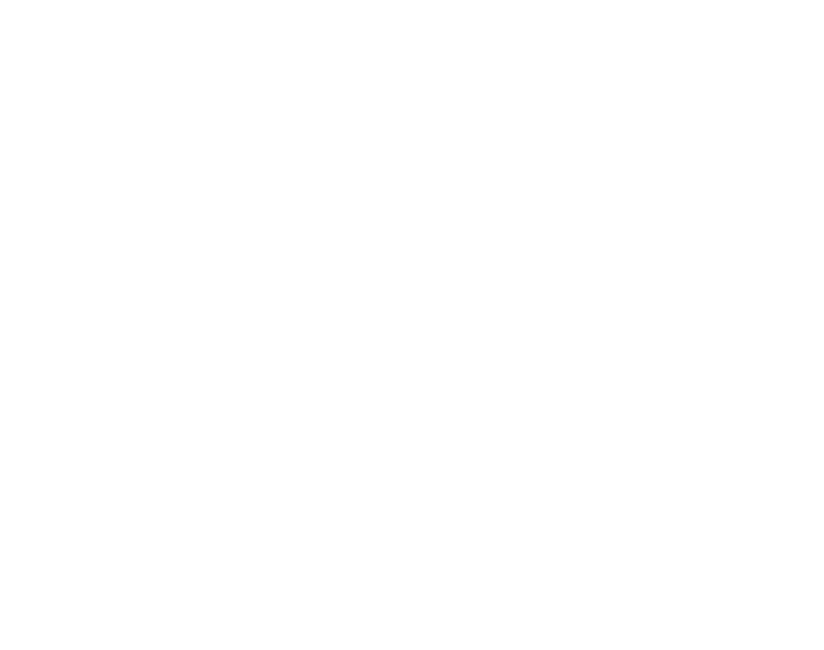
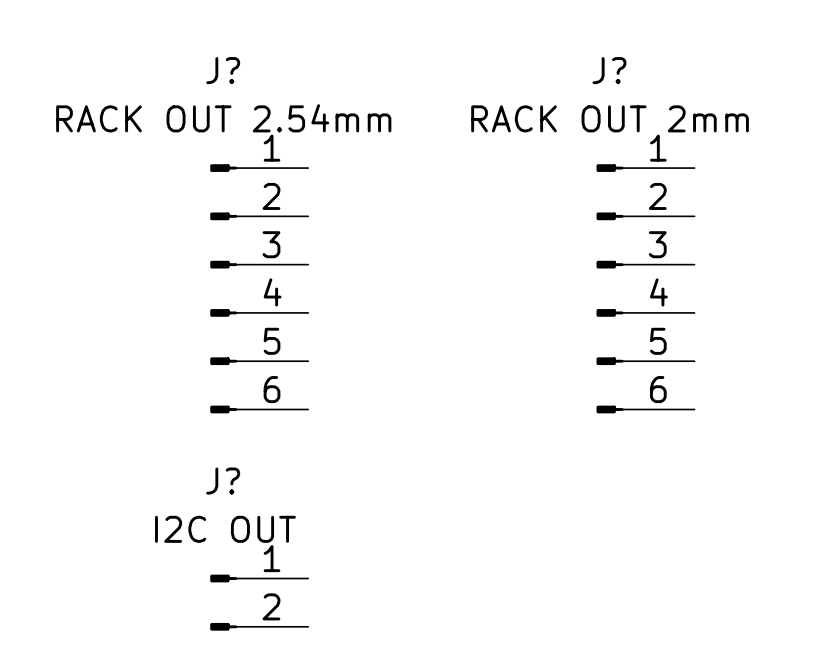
J?: none -> RACK OUT 2.54mm (259, 288)
J?: none -> RACK OUT 2mm (645, 288)
J?: none -> I2C OUT (259, 602)

